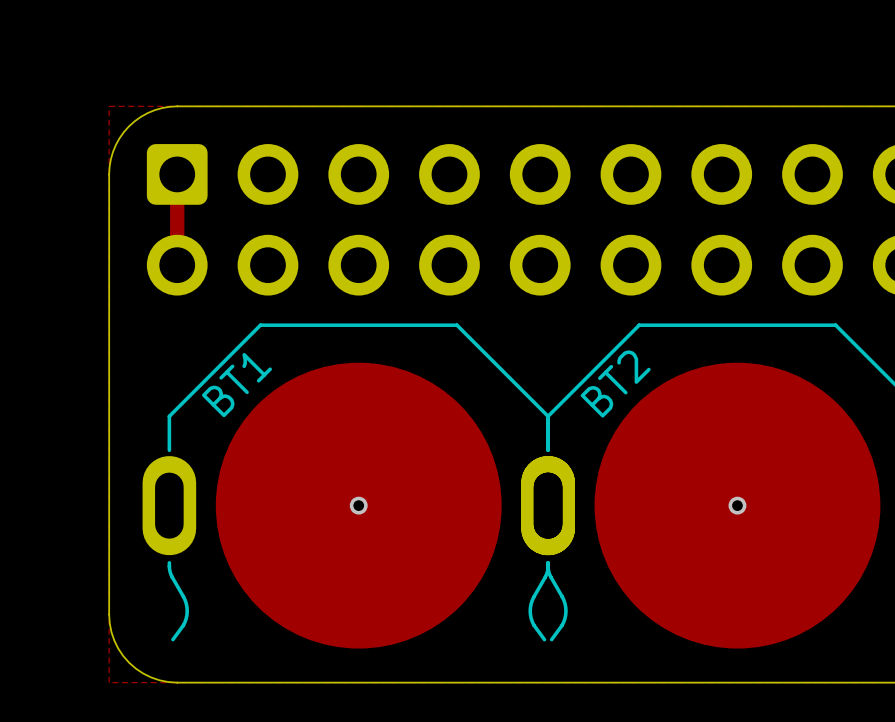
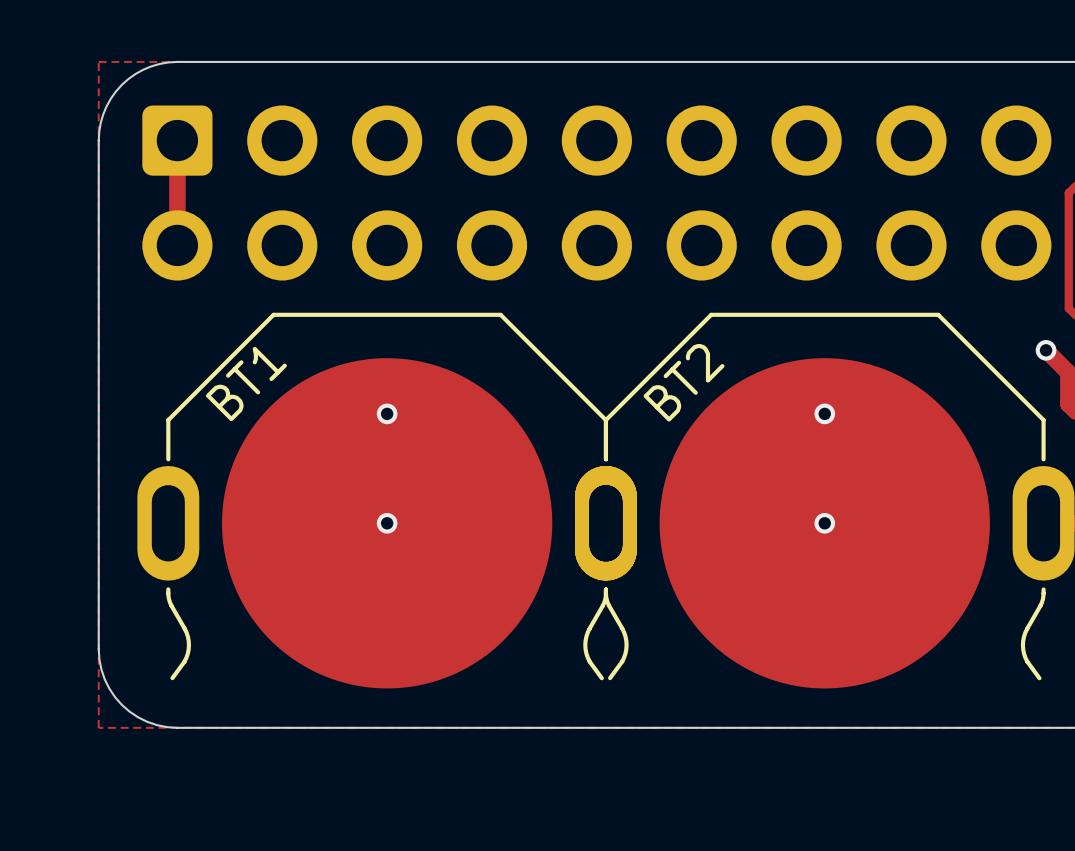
via: none -> (387, 413)
via: none -> (824, 413)

